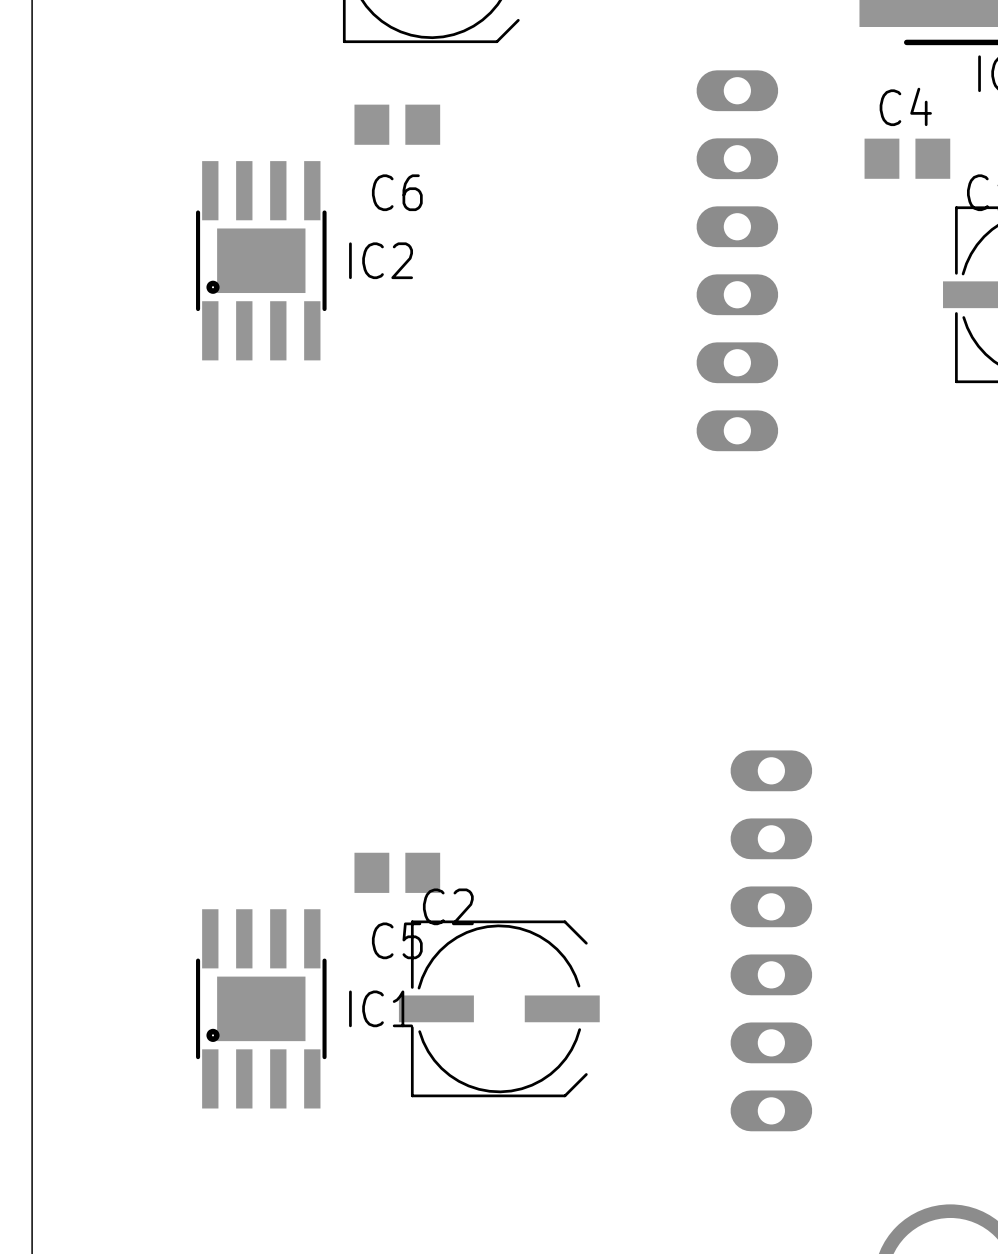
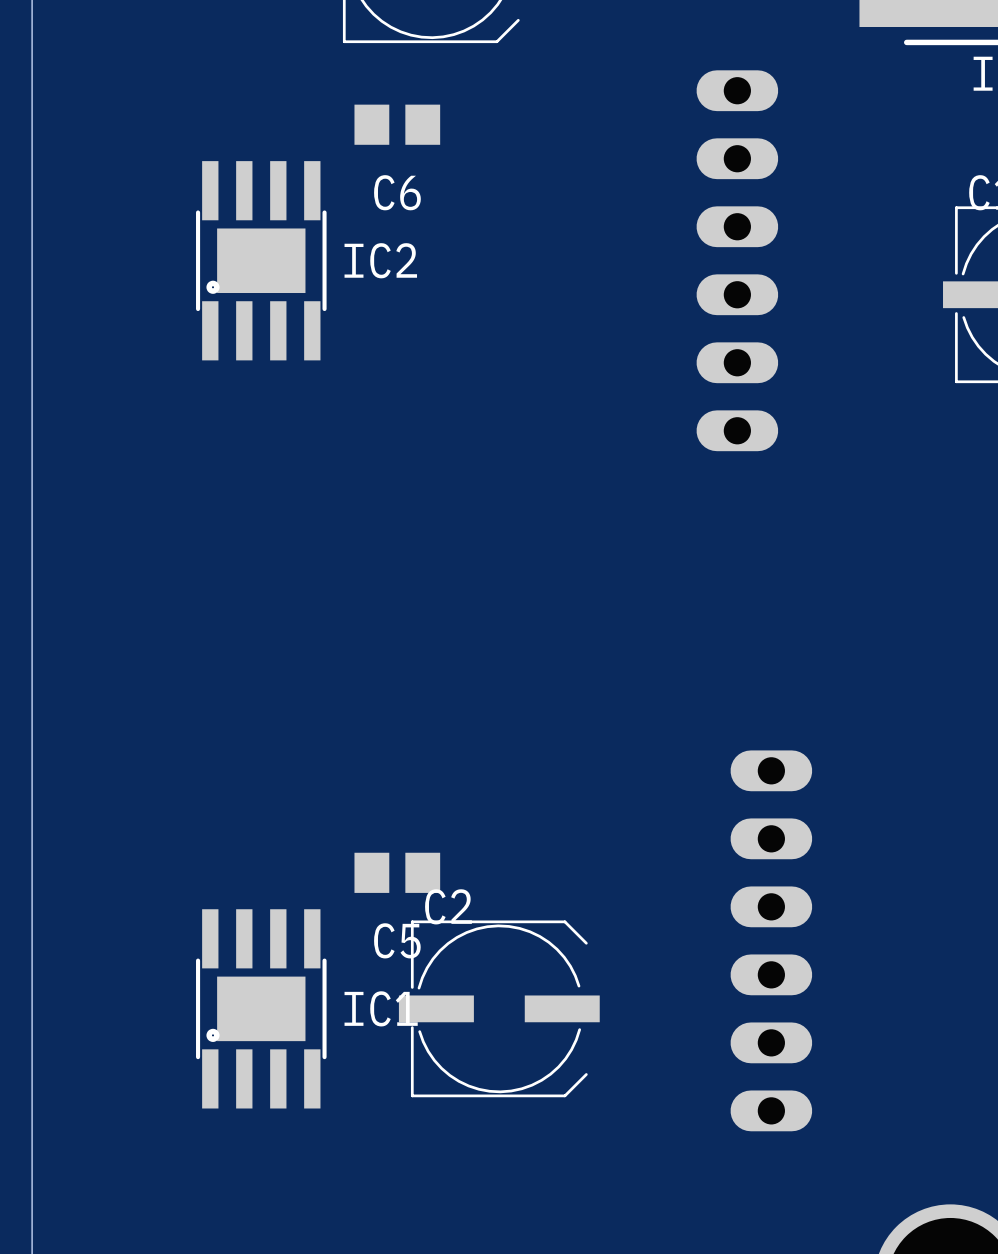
C4: (907, 158) -> none

